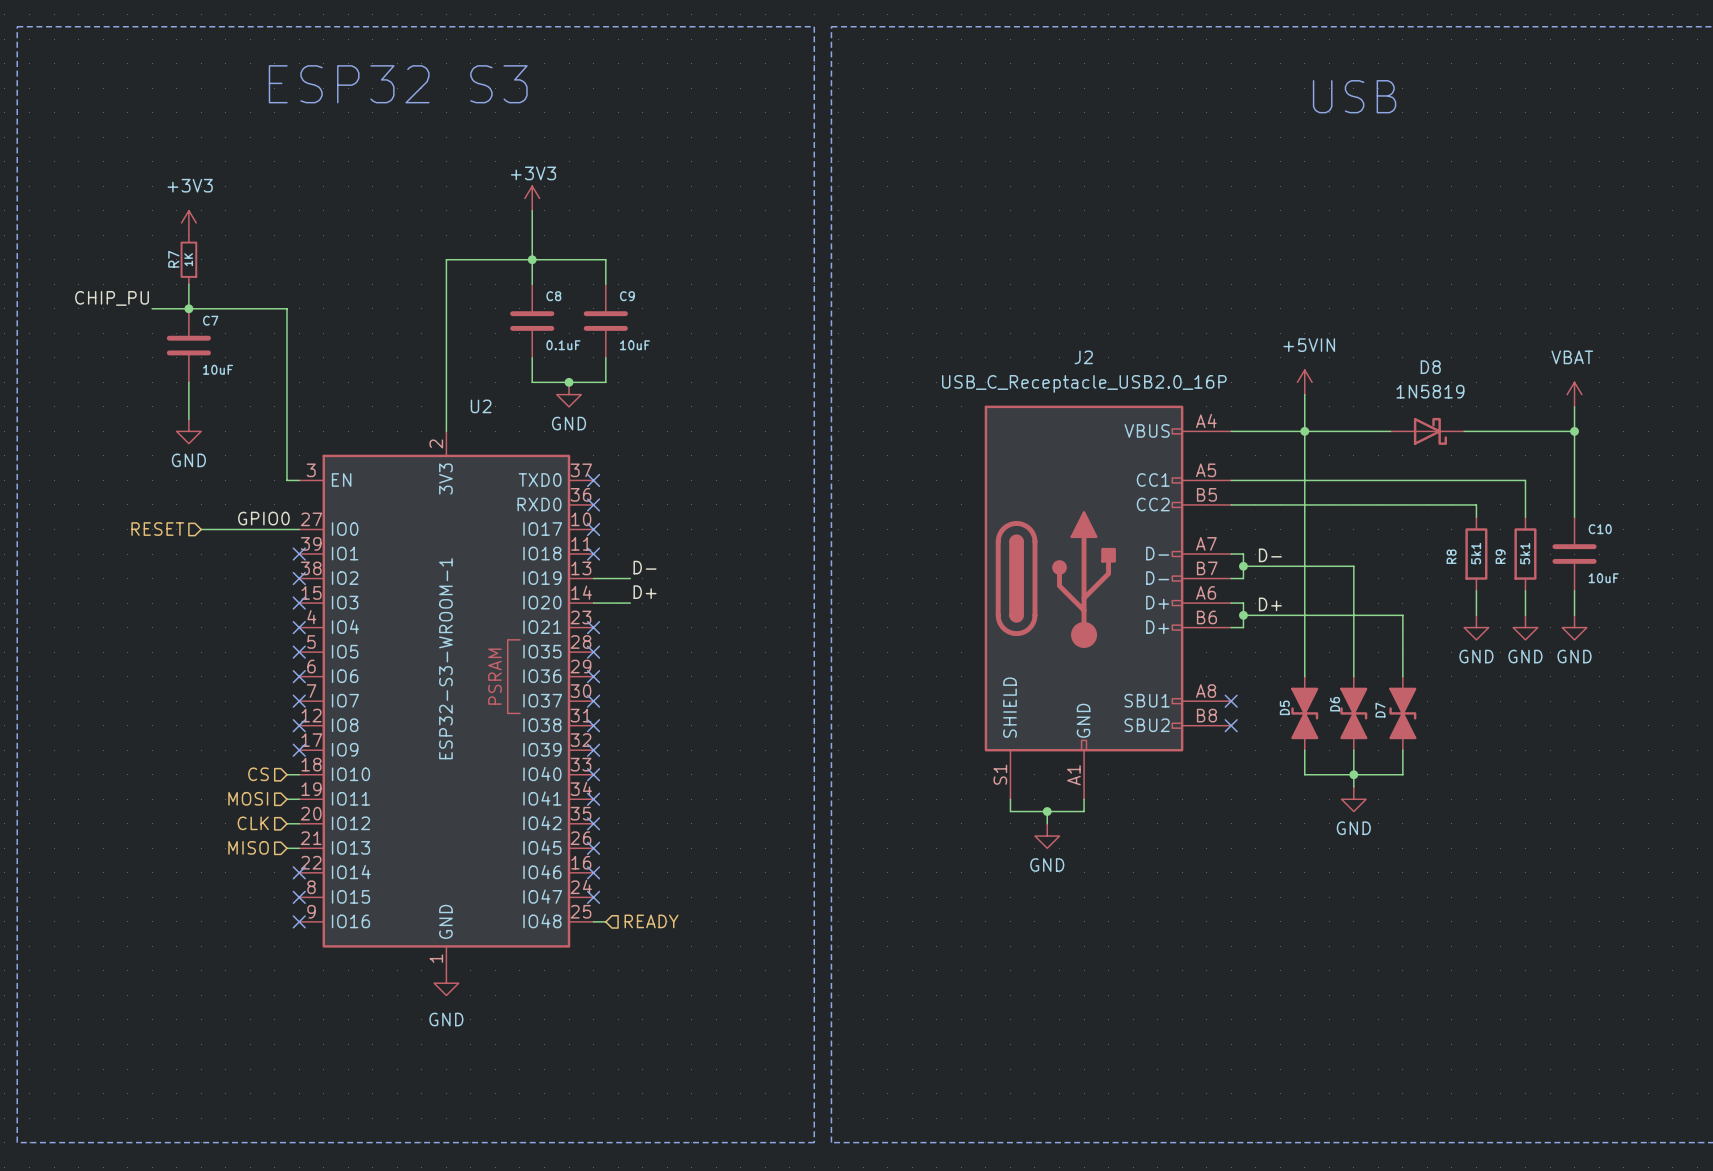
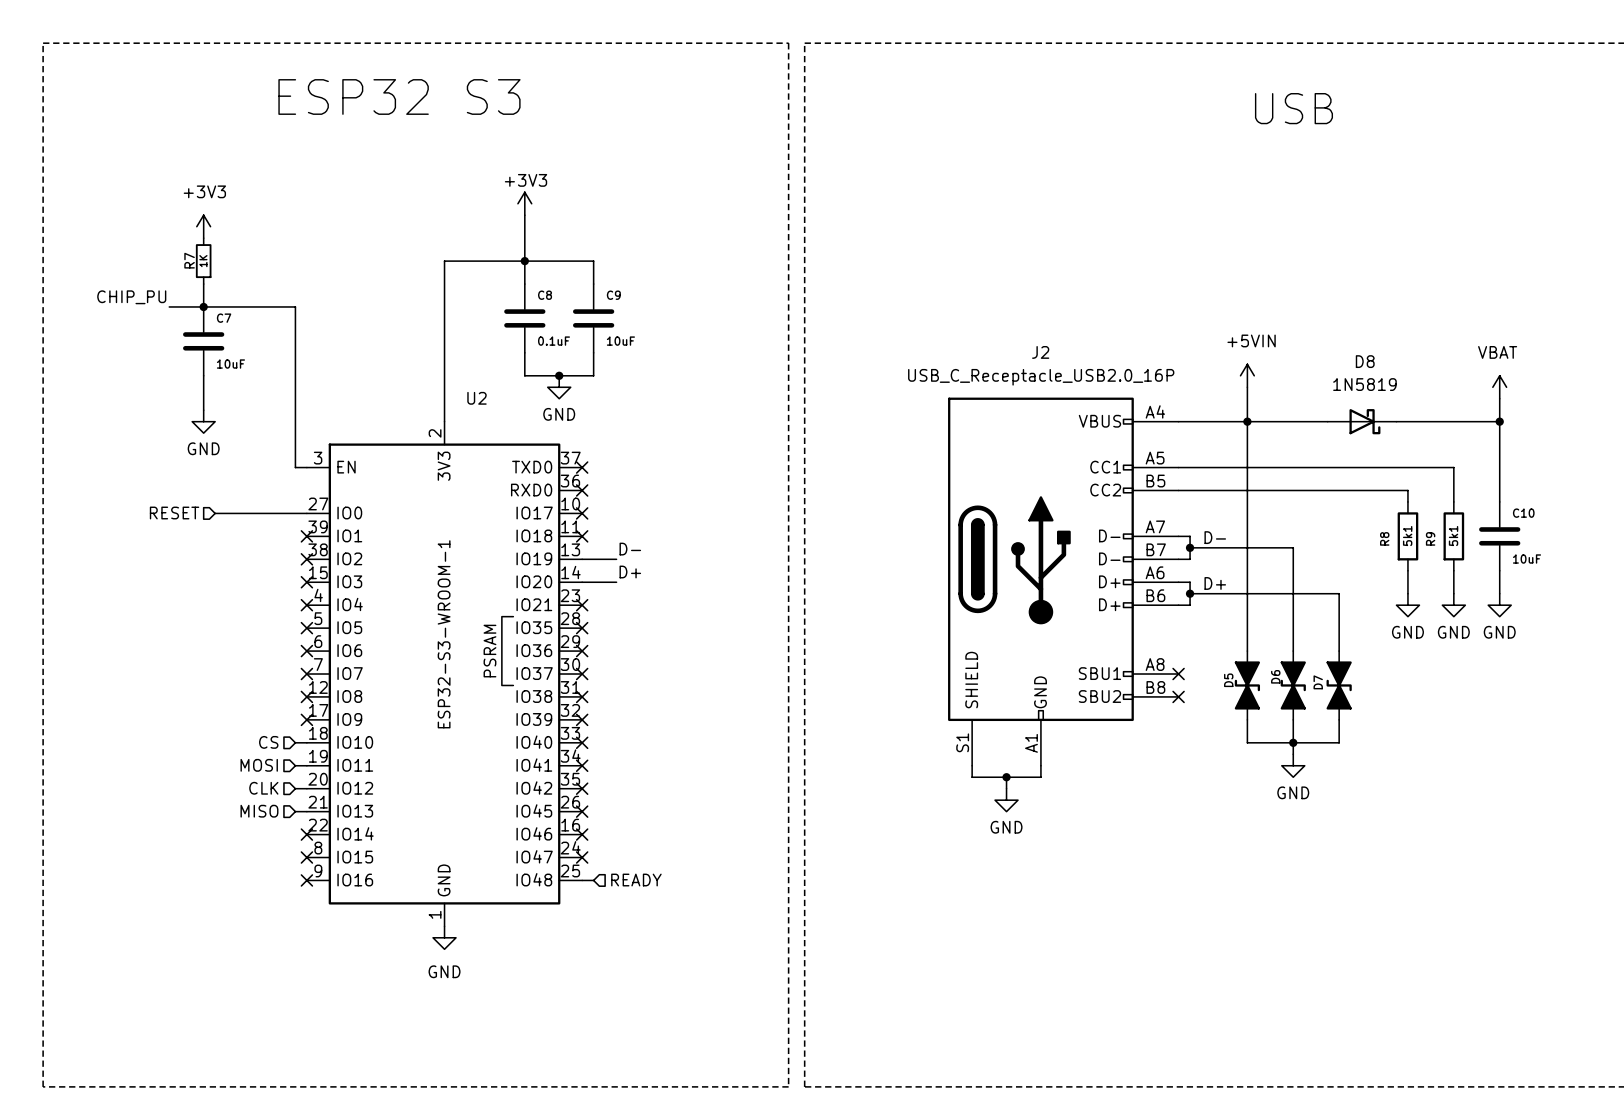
label: GPIO0 (263, 518) -> none

